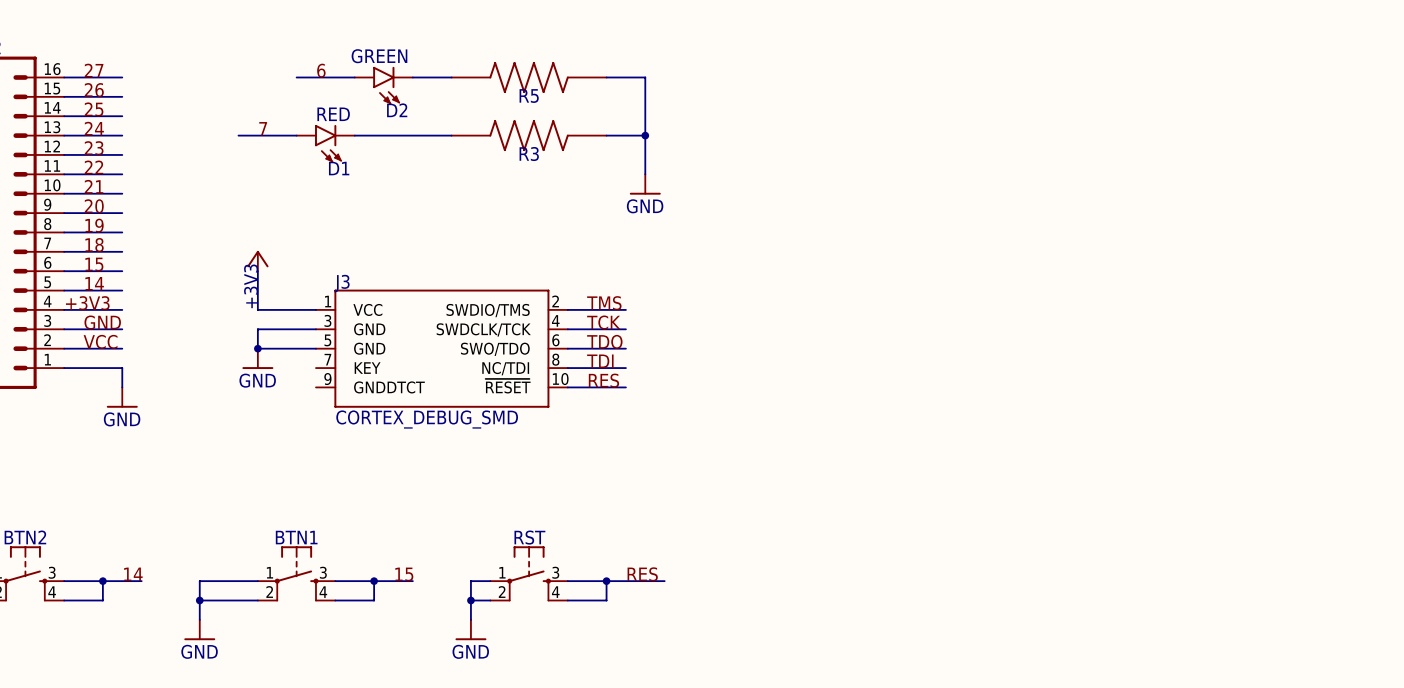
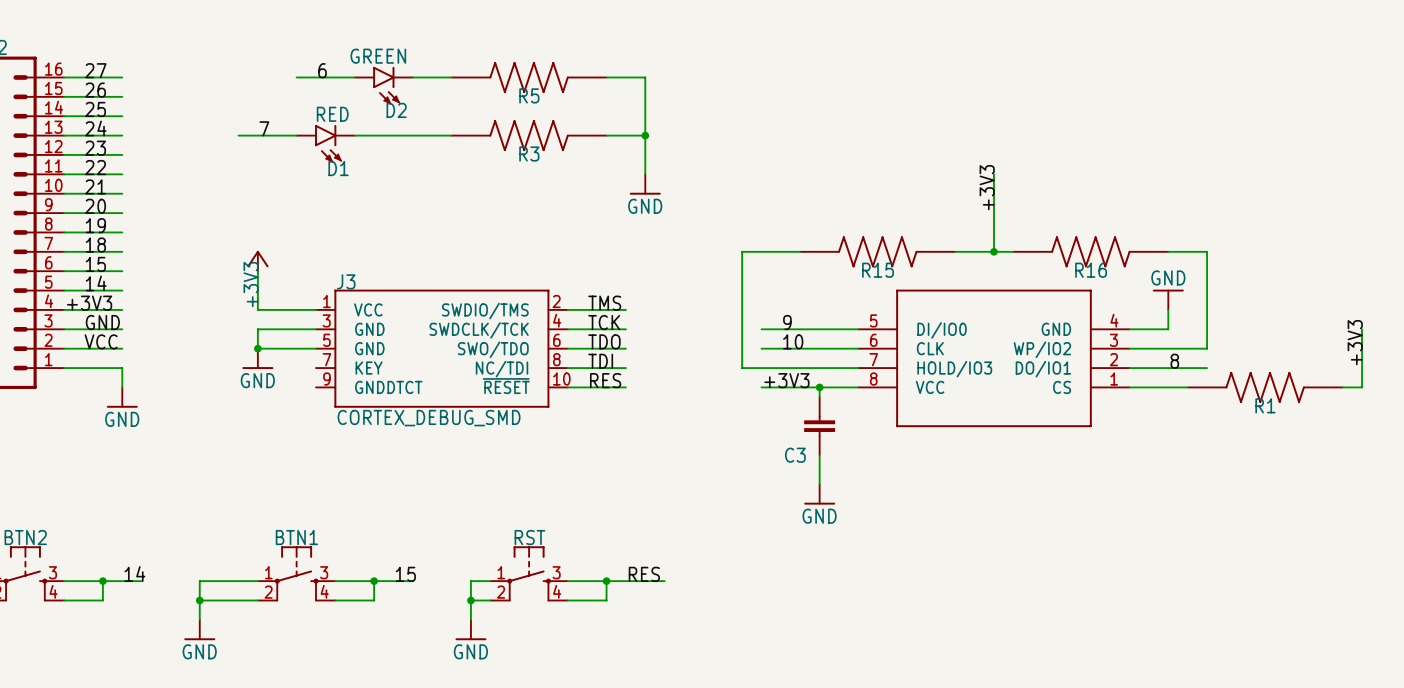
wire: none -> (993, 174) (993, 251)
label: none -> +3V3 (987, 187)
wire: none -> (800, 251) (742, 251) (742, 368) (858, 368)
R15: none -> (877, 251)
wire: none -> (955, 251) (1013, 251)
junction: none -> (993, 251)
R16: none -> (1090, 251)
wire: none -> (1168, 251) (1207, 251) (1207, 348) (1129, 348)
power symbol: none -> GND (1168, 299)
wire: none -> (1168, 309) (1168, 329) (1129, 329)
label: none -> 9 (787, 322)
wire: none -> (761, 329) (858, 329)
wire: none -> (1362, 329) (1362, 387) (1342, 387)
label: none -> 10 (793, 341)
label: none -> +3V3 (1355, 342)
wire: none -> (761, 348) (858, 348)
part: none -> (993, 358)
label: none -> 8 (1174, 361)
wire: none -> (1129, 368) (1207, 368)
label: none -> +3V3 (786, 380)
wire: none -> (761, 387) (858, 387)
wire: none -> (819, 387) (819, 397)
junction: none -> (819, 387)
wire: none -> (1129, 387) (1187, 387)
R1: none -> (1265, 387)
C3: none -> (819, 426)
wire: none -> (819, 455) (819, 484)
power symbol: none -> GND (819, 494)

